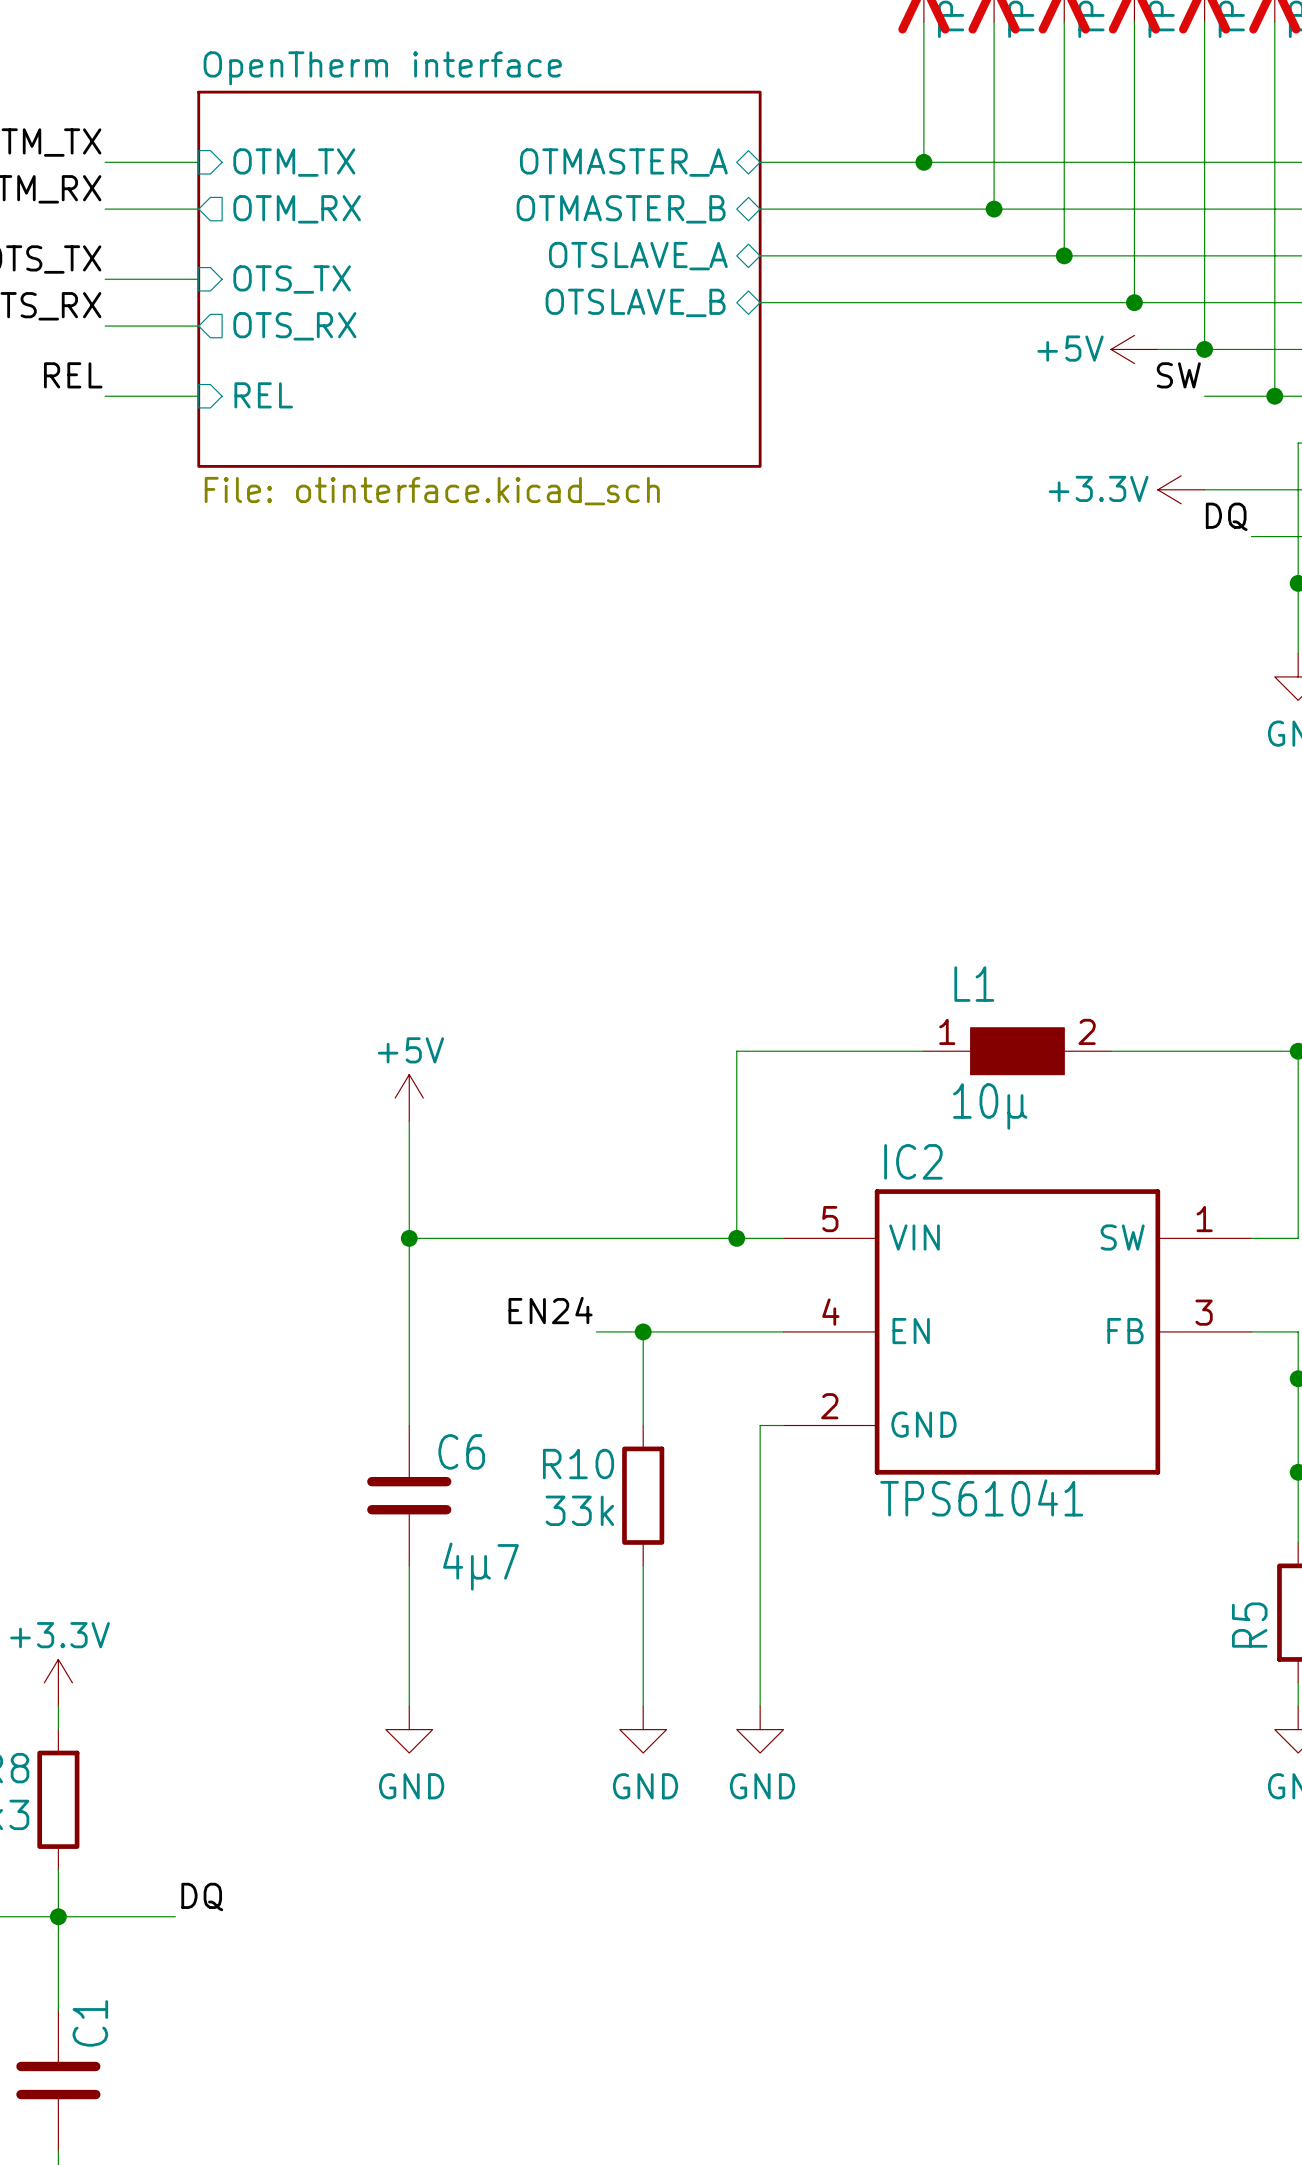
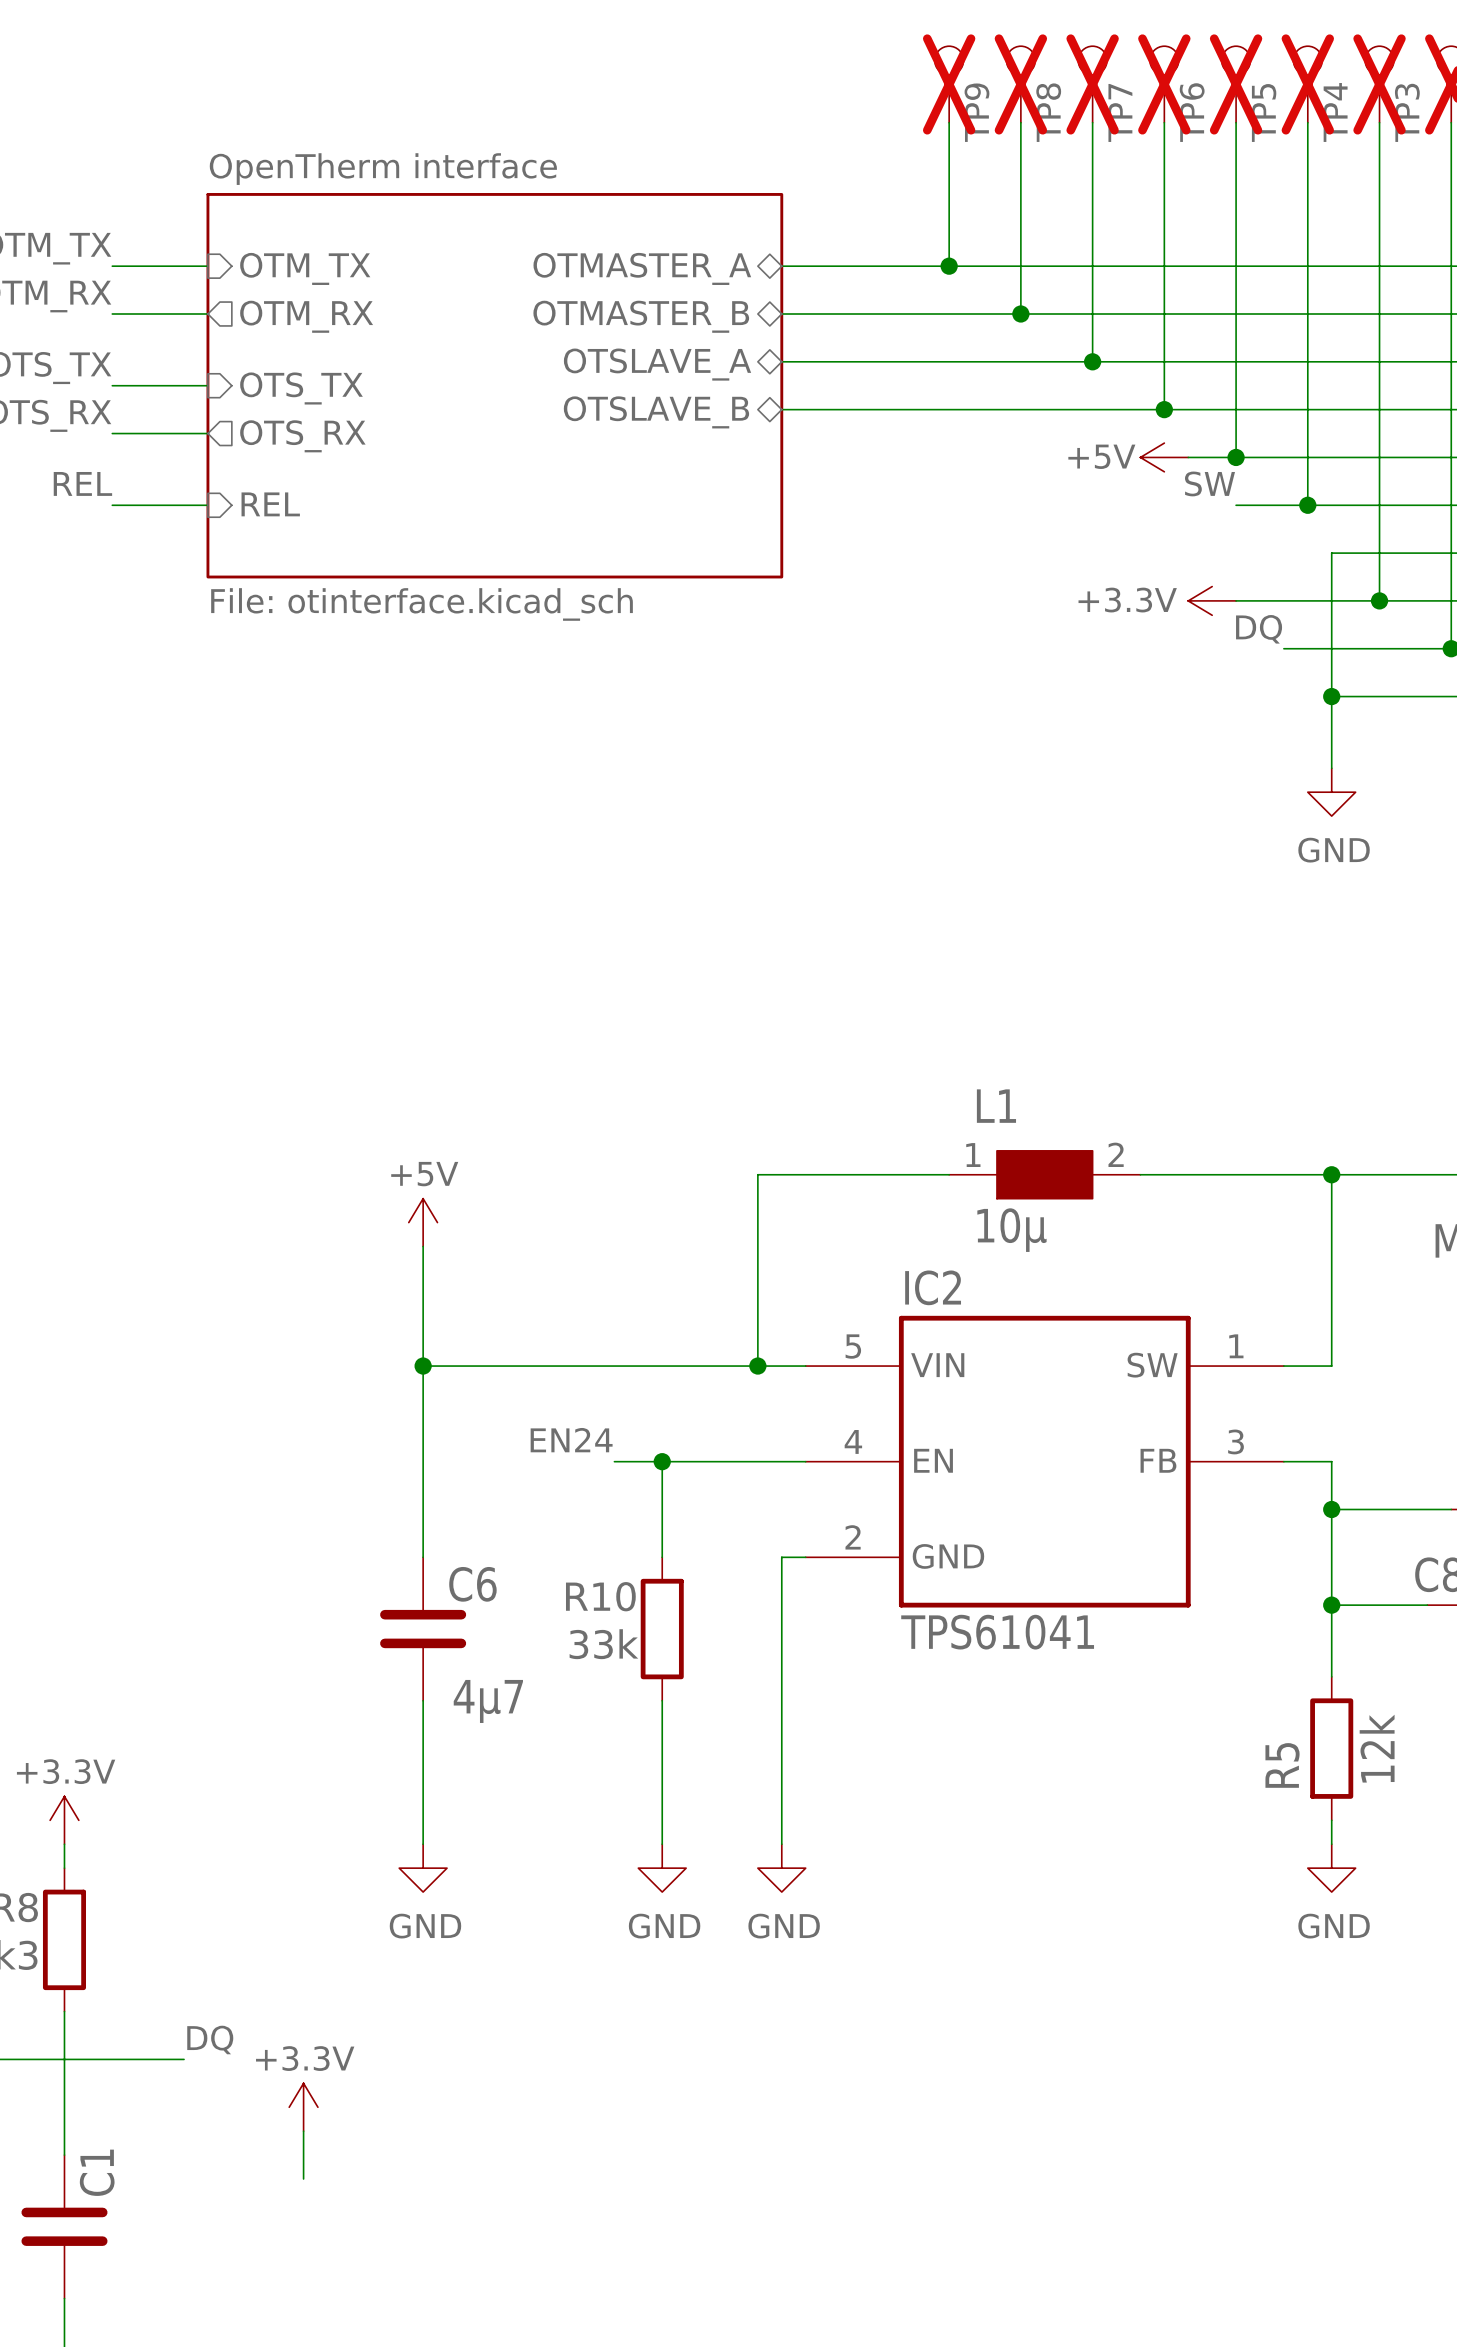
junction: (58, 1916) -> none
power symbol: none -> +3.3V (303, 2107)
wire: none -> (303, 2131) (303, 2178)

